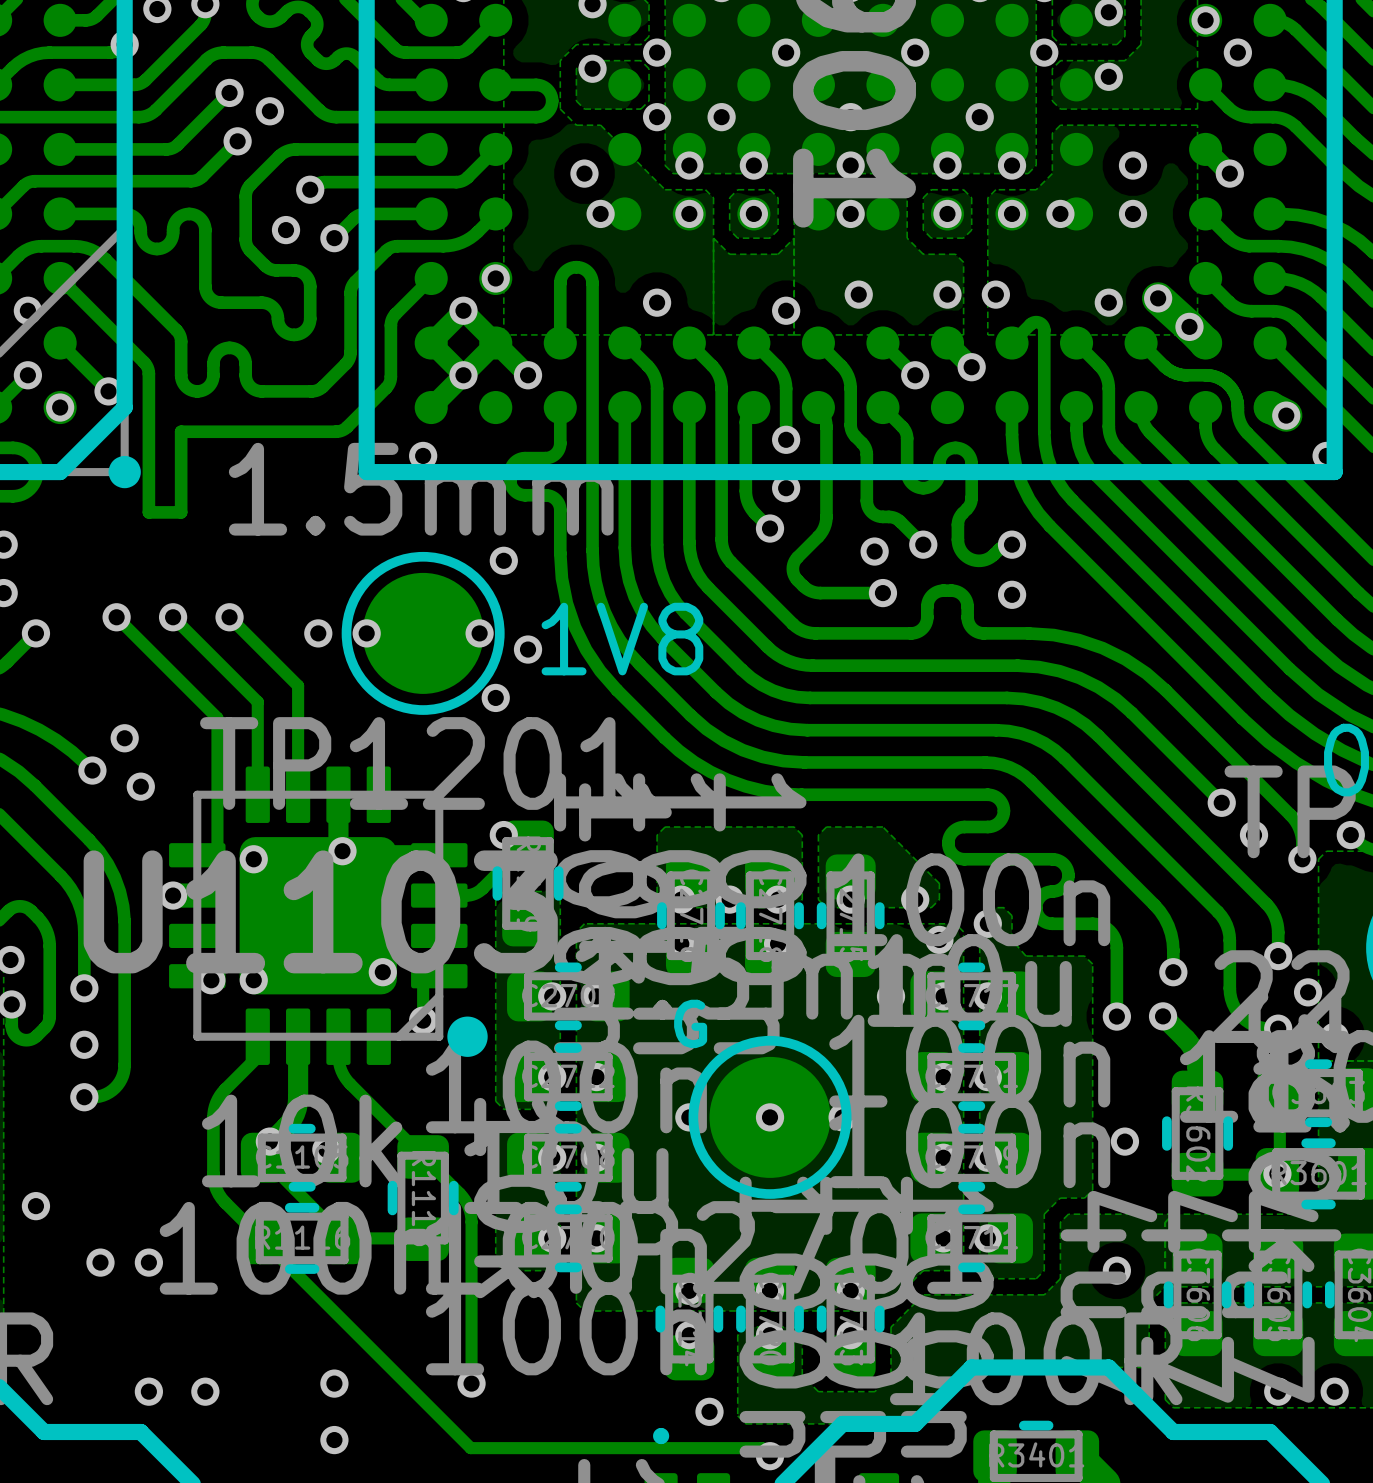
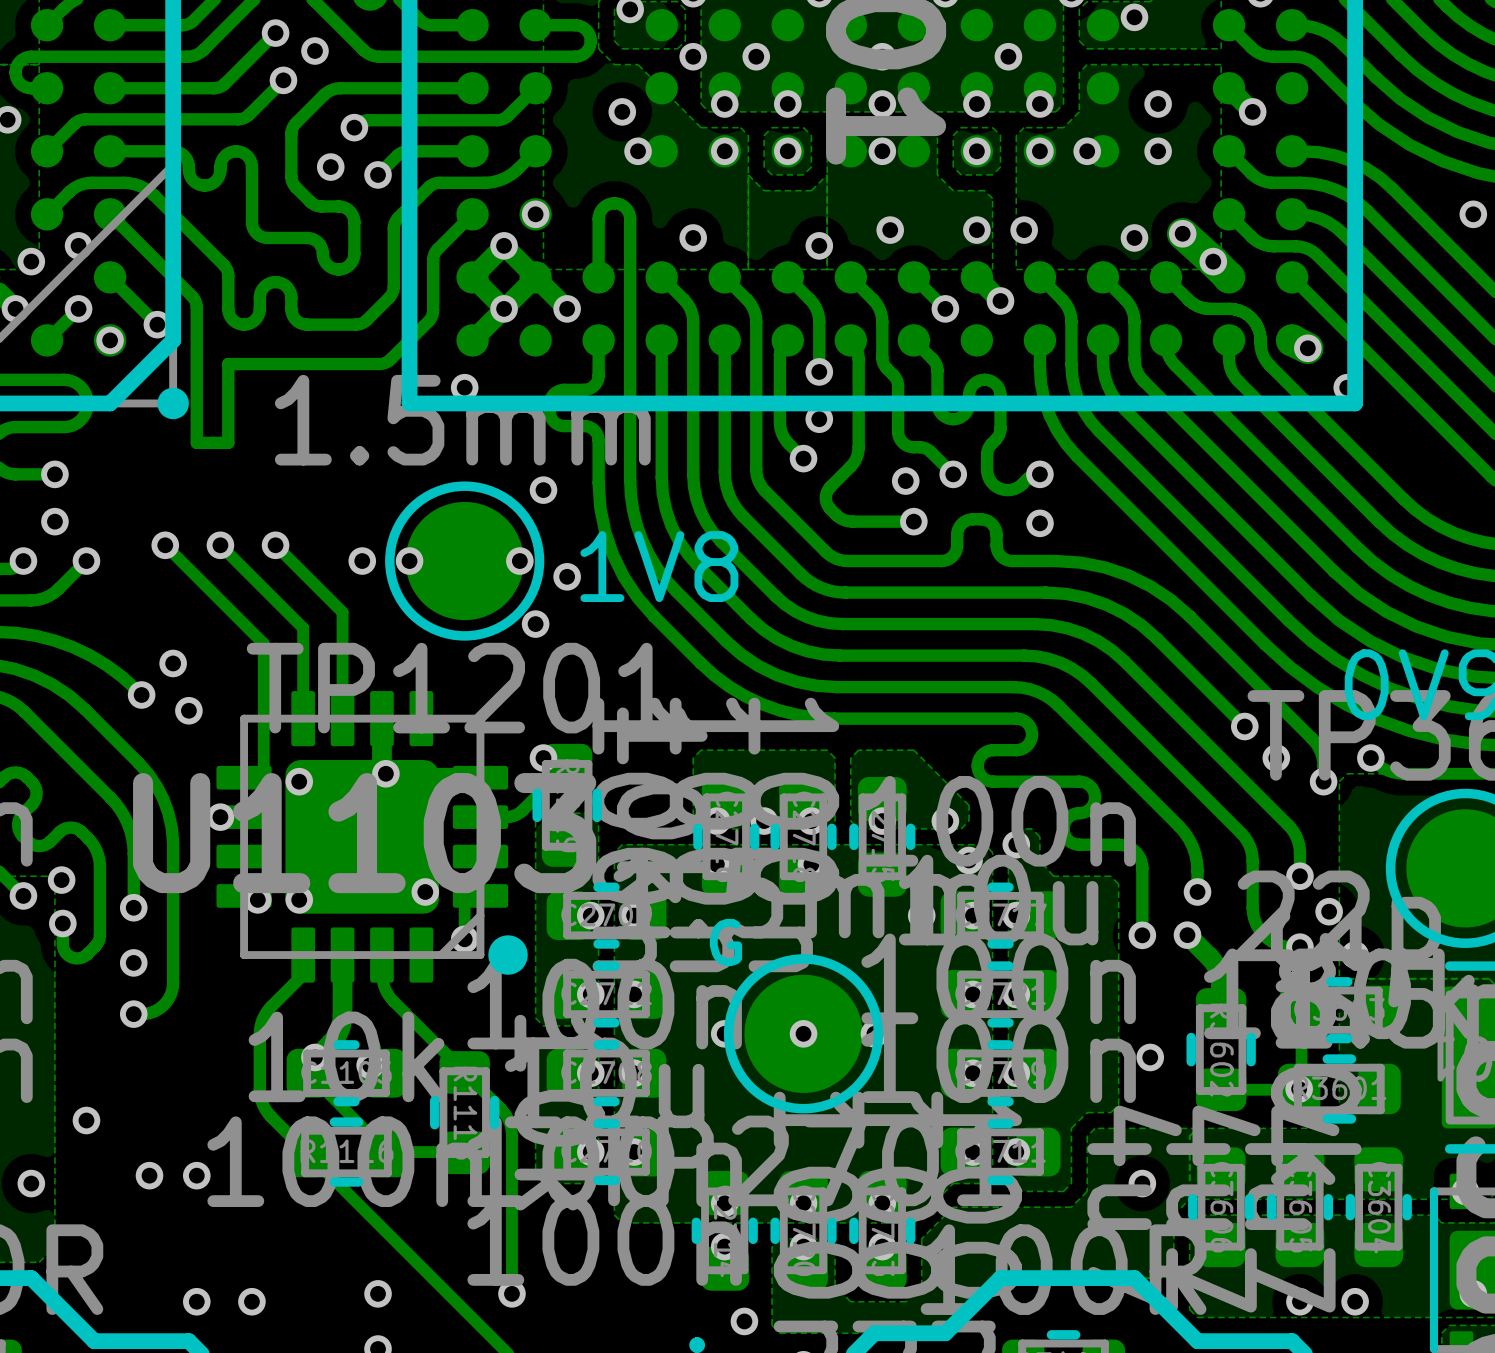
track: (1012, 343) (1031, 323) (1037, 322) (1042, 325) (1044, 388) -> (1039, 277) (1066, 304) (1071, 321)

